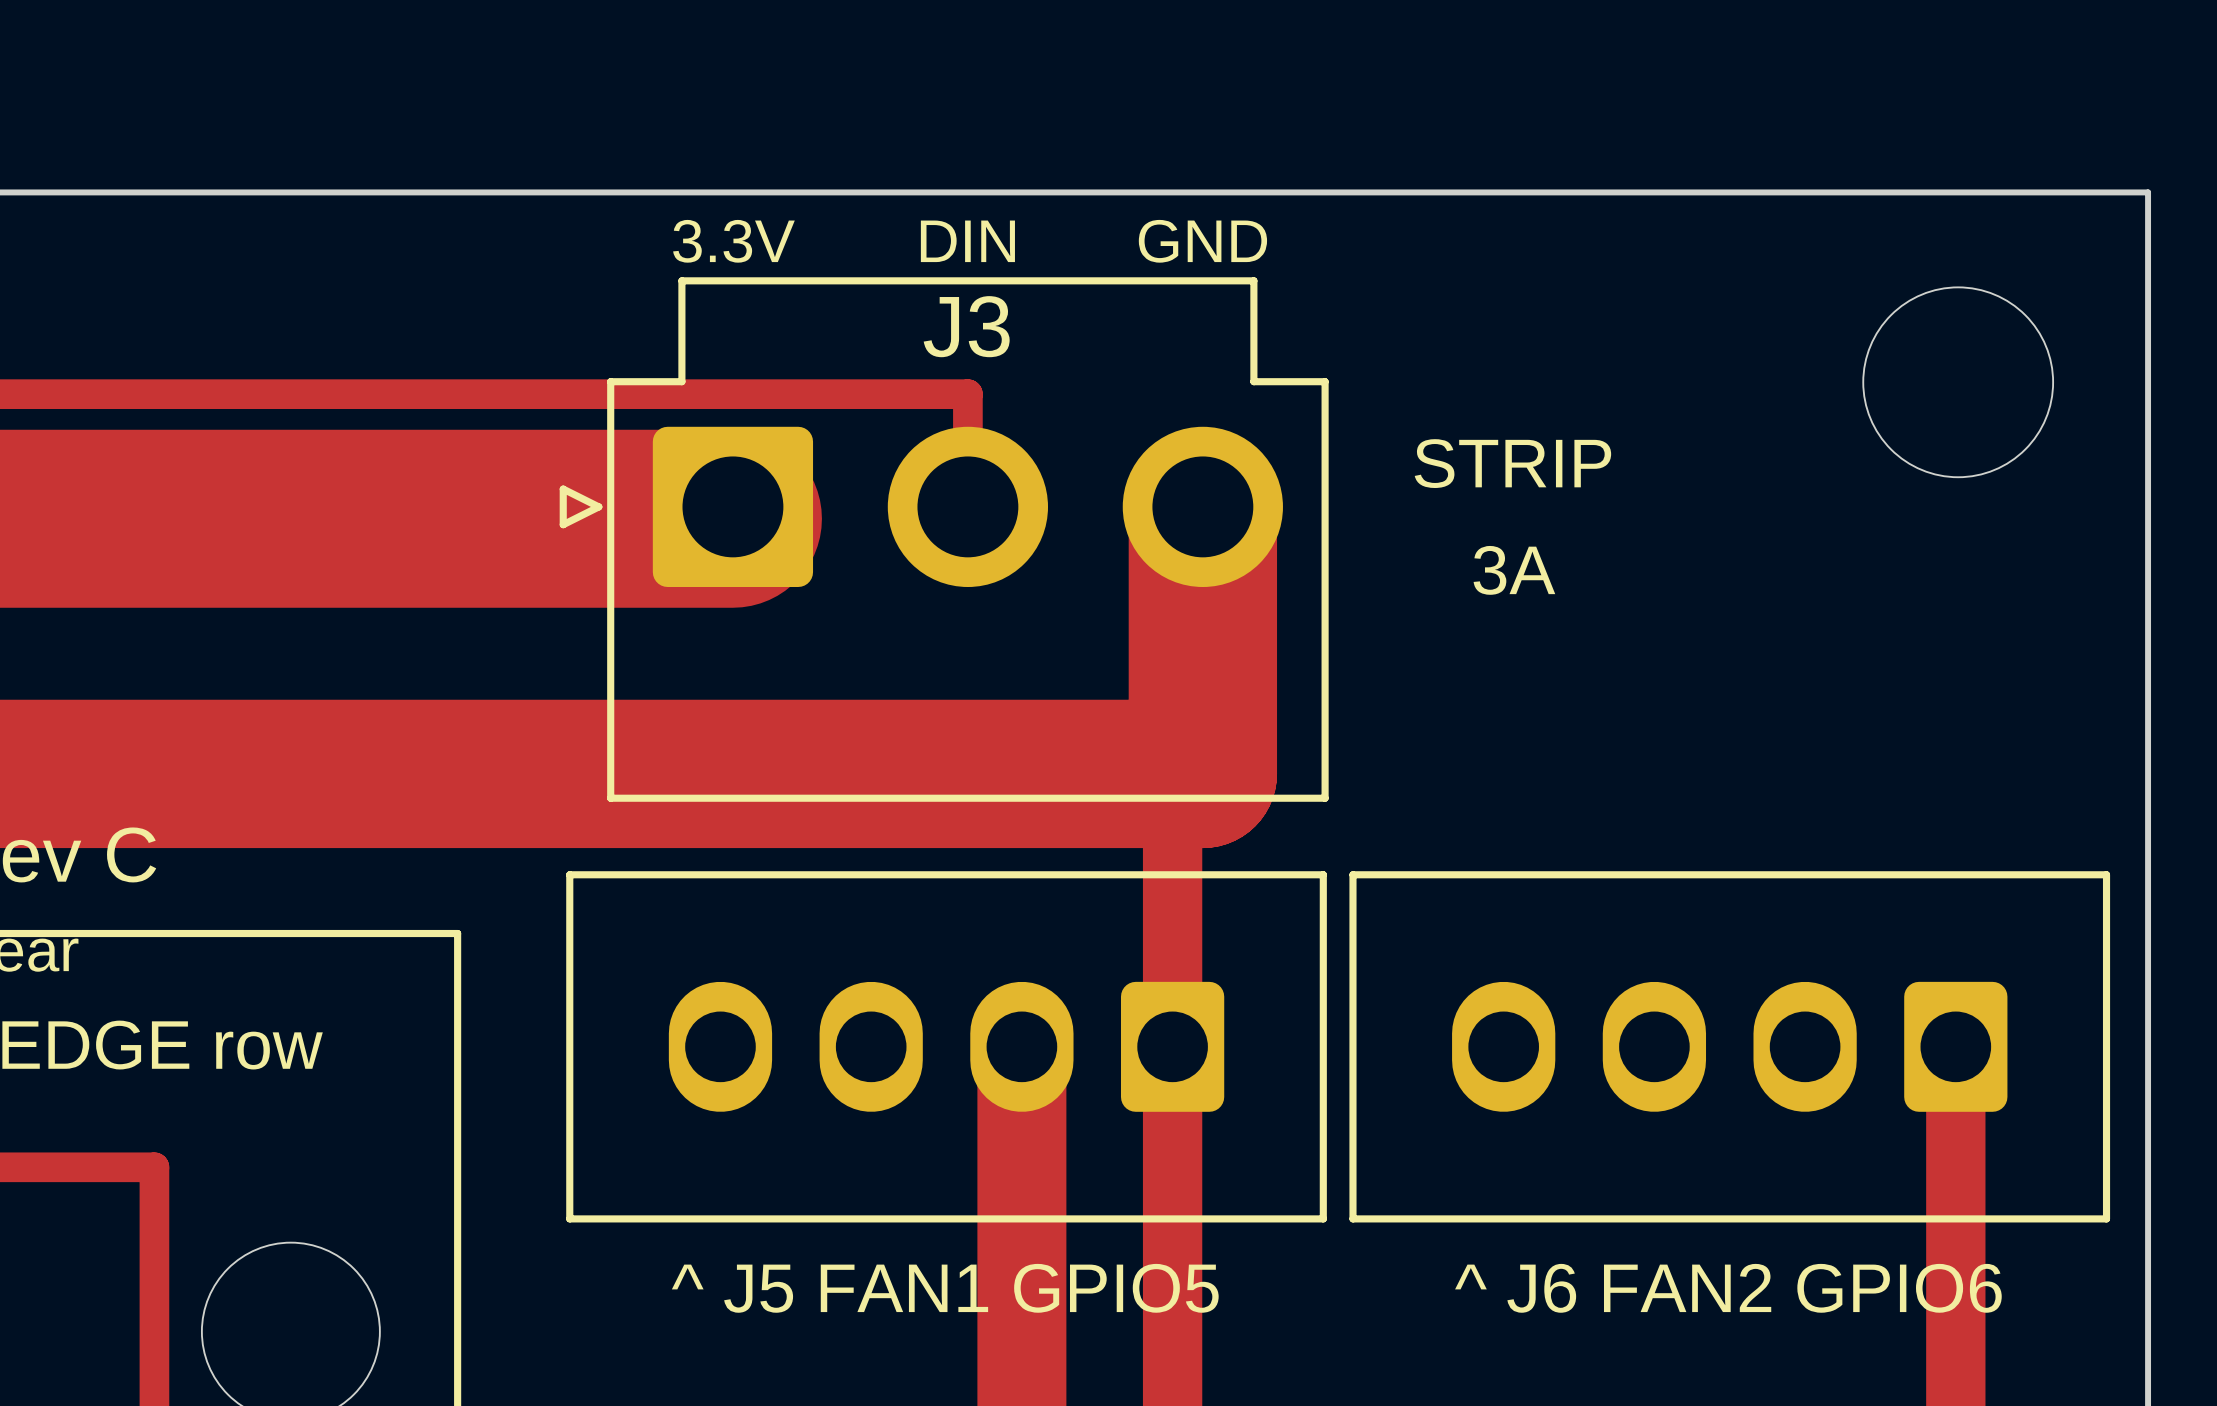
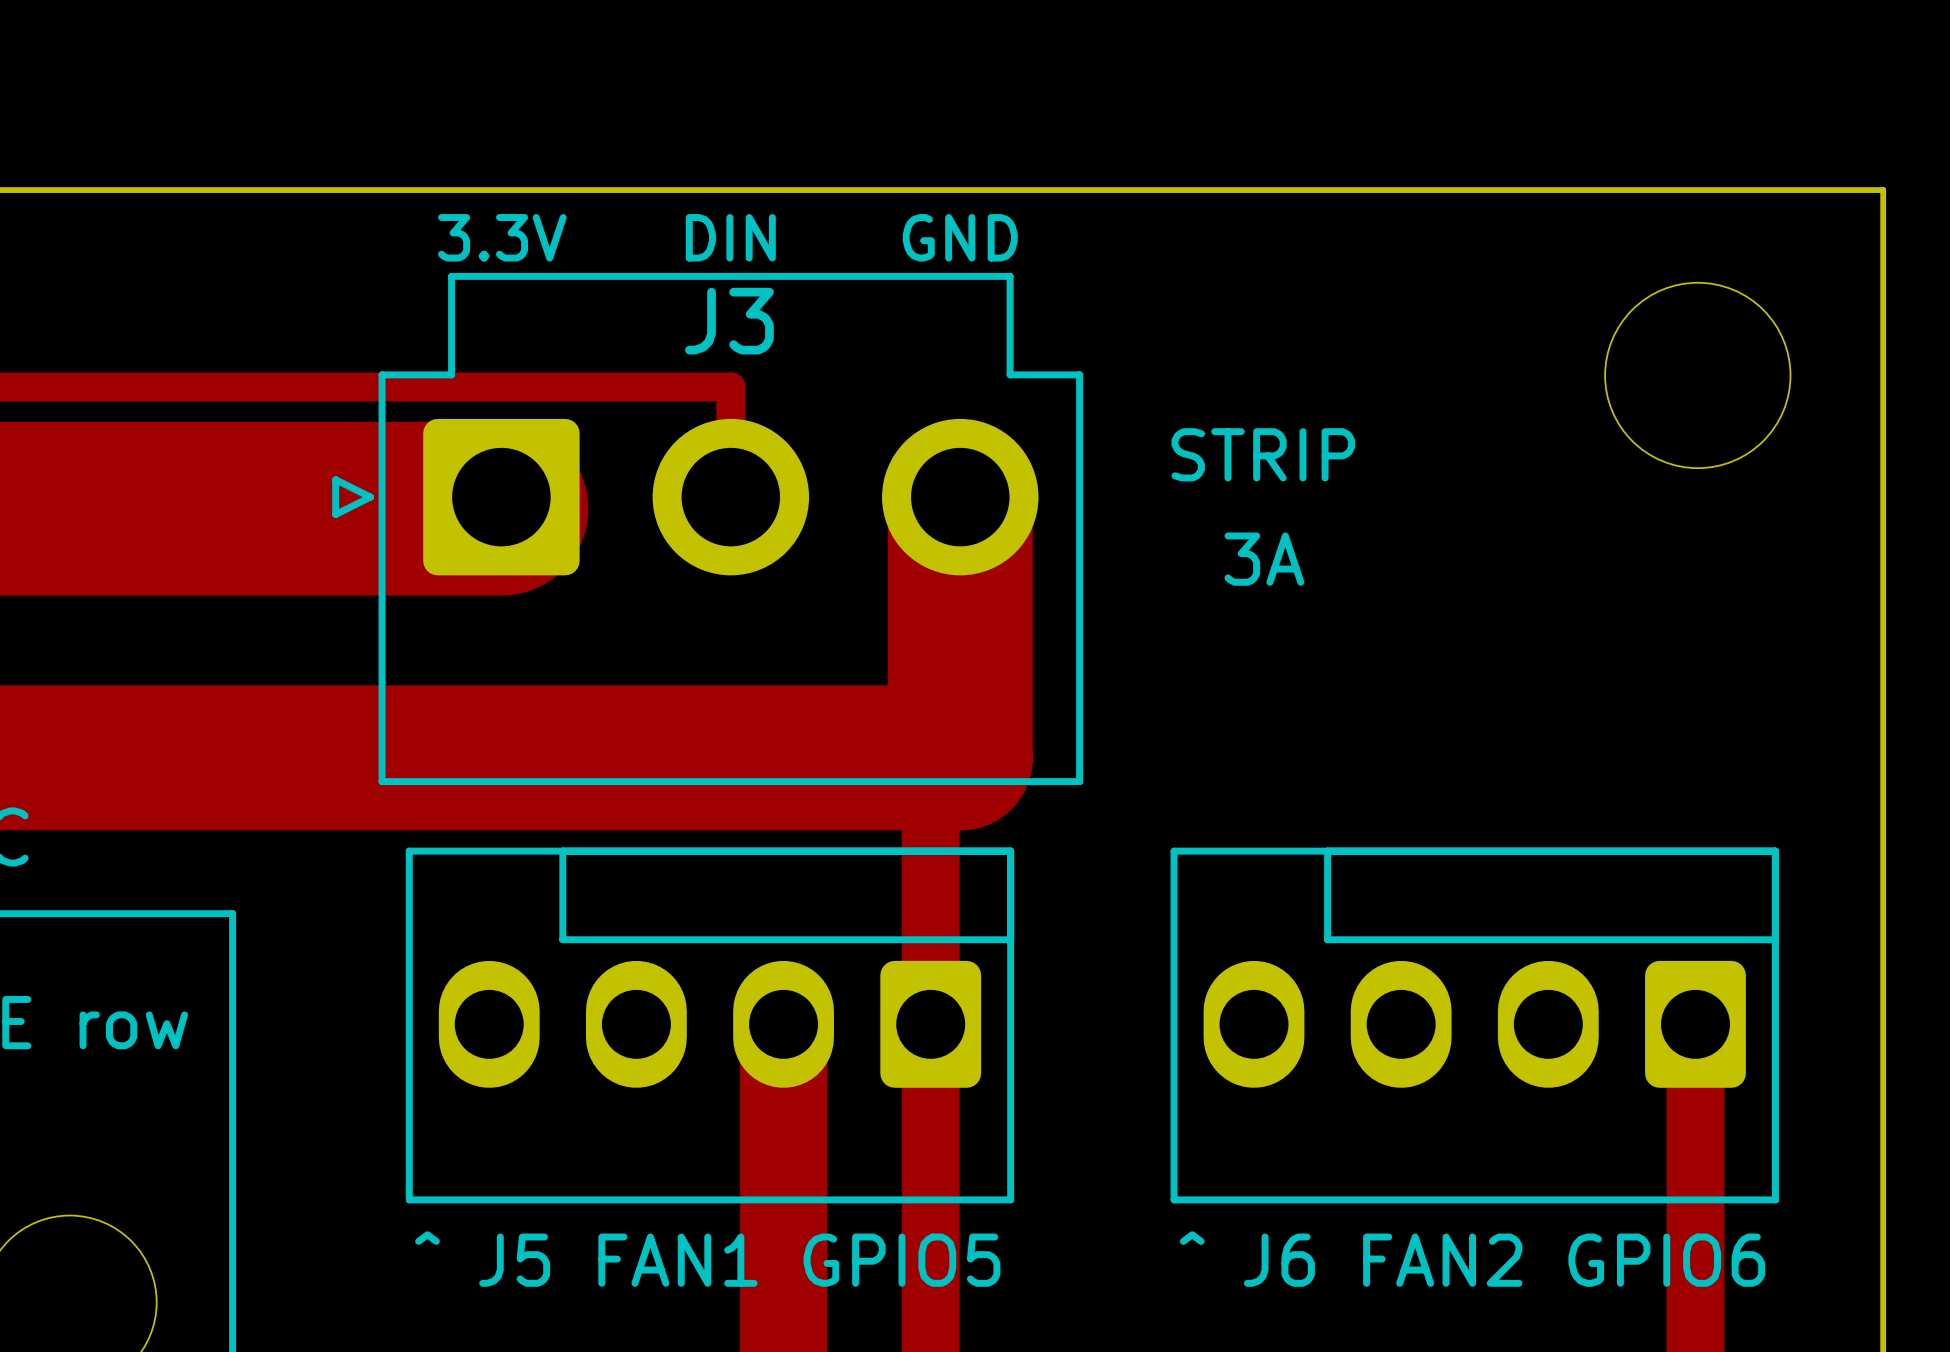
line: none -> (562, 851) (562, 939) (1010, 939)
line: none -> (1327, 851) (1327, 939) (1775, 939)
line: (569, 874) (1323, 874) (1323, 1218) (569, 1218) (569, 874) -> (409, 851) (409, 1199) (1010, 1199) (1010, 851) (409, 851)
line: (1352, 874) (2106, 874) (2106, 1218) (1352, 1218) (1352, 874) -> (1174, 851) (1174, 1199) (1775, 1199) (1775, 851) (1174, 851)

